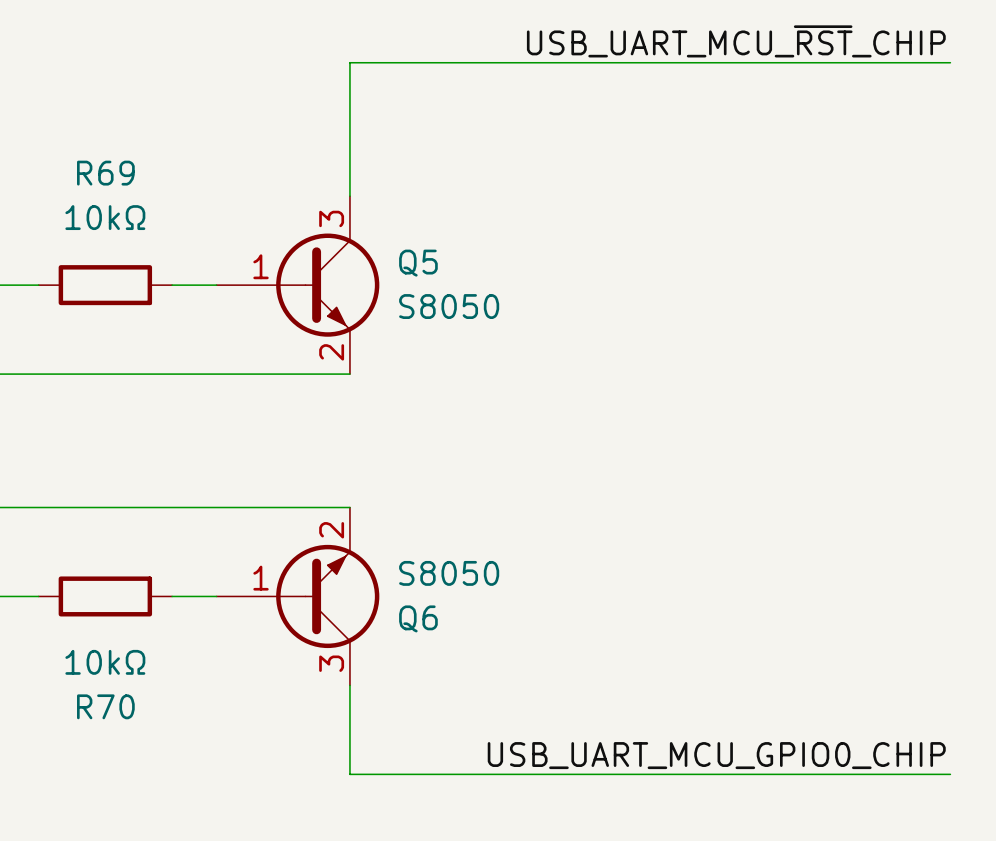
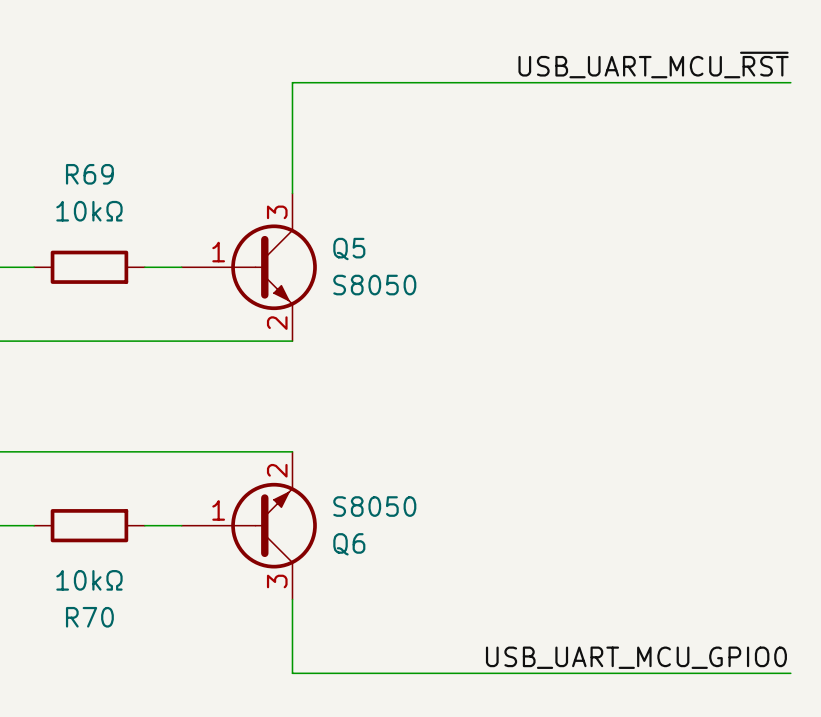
label: USB_UART_MCU_~{RST}_CHIP (736, 41) -> USB_UART_MCU_~{RST} (653, 64)
label: USB_UART_MCU_GPIO0_CHIP (716, 755) -> USB_UART_MCU_GPIO0 (636, 657)

